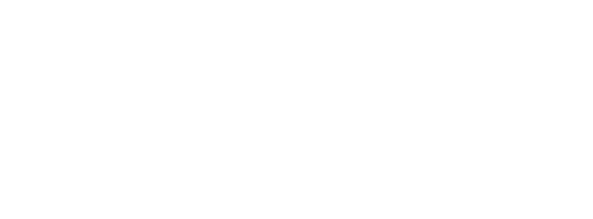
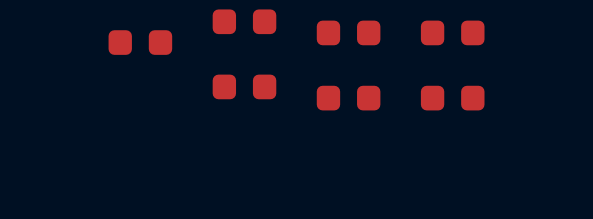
part: none -> (244, 21)
part: none -> (348, 32)
part: none -> (452, 32)
part: none -> (140, 42)
part: none -> (244, 86)
part: none -> (348, 98)
part: none -> (452, 98)

